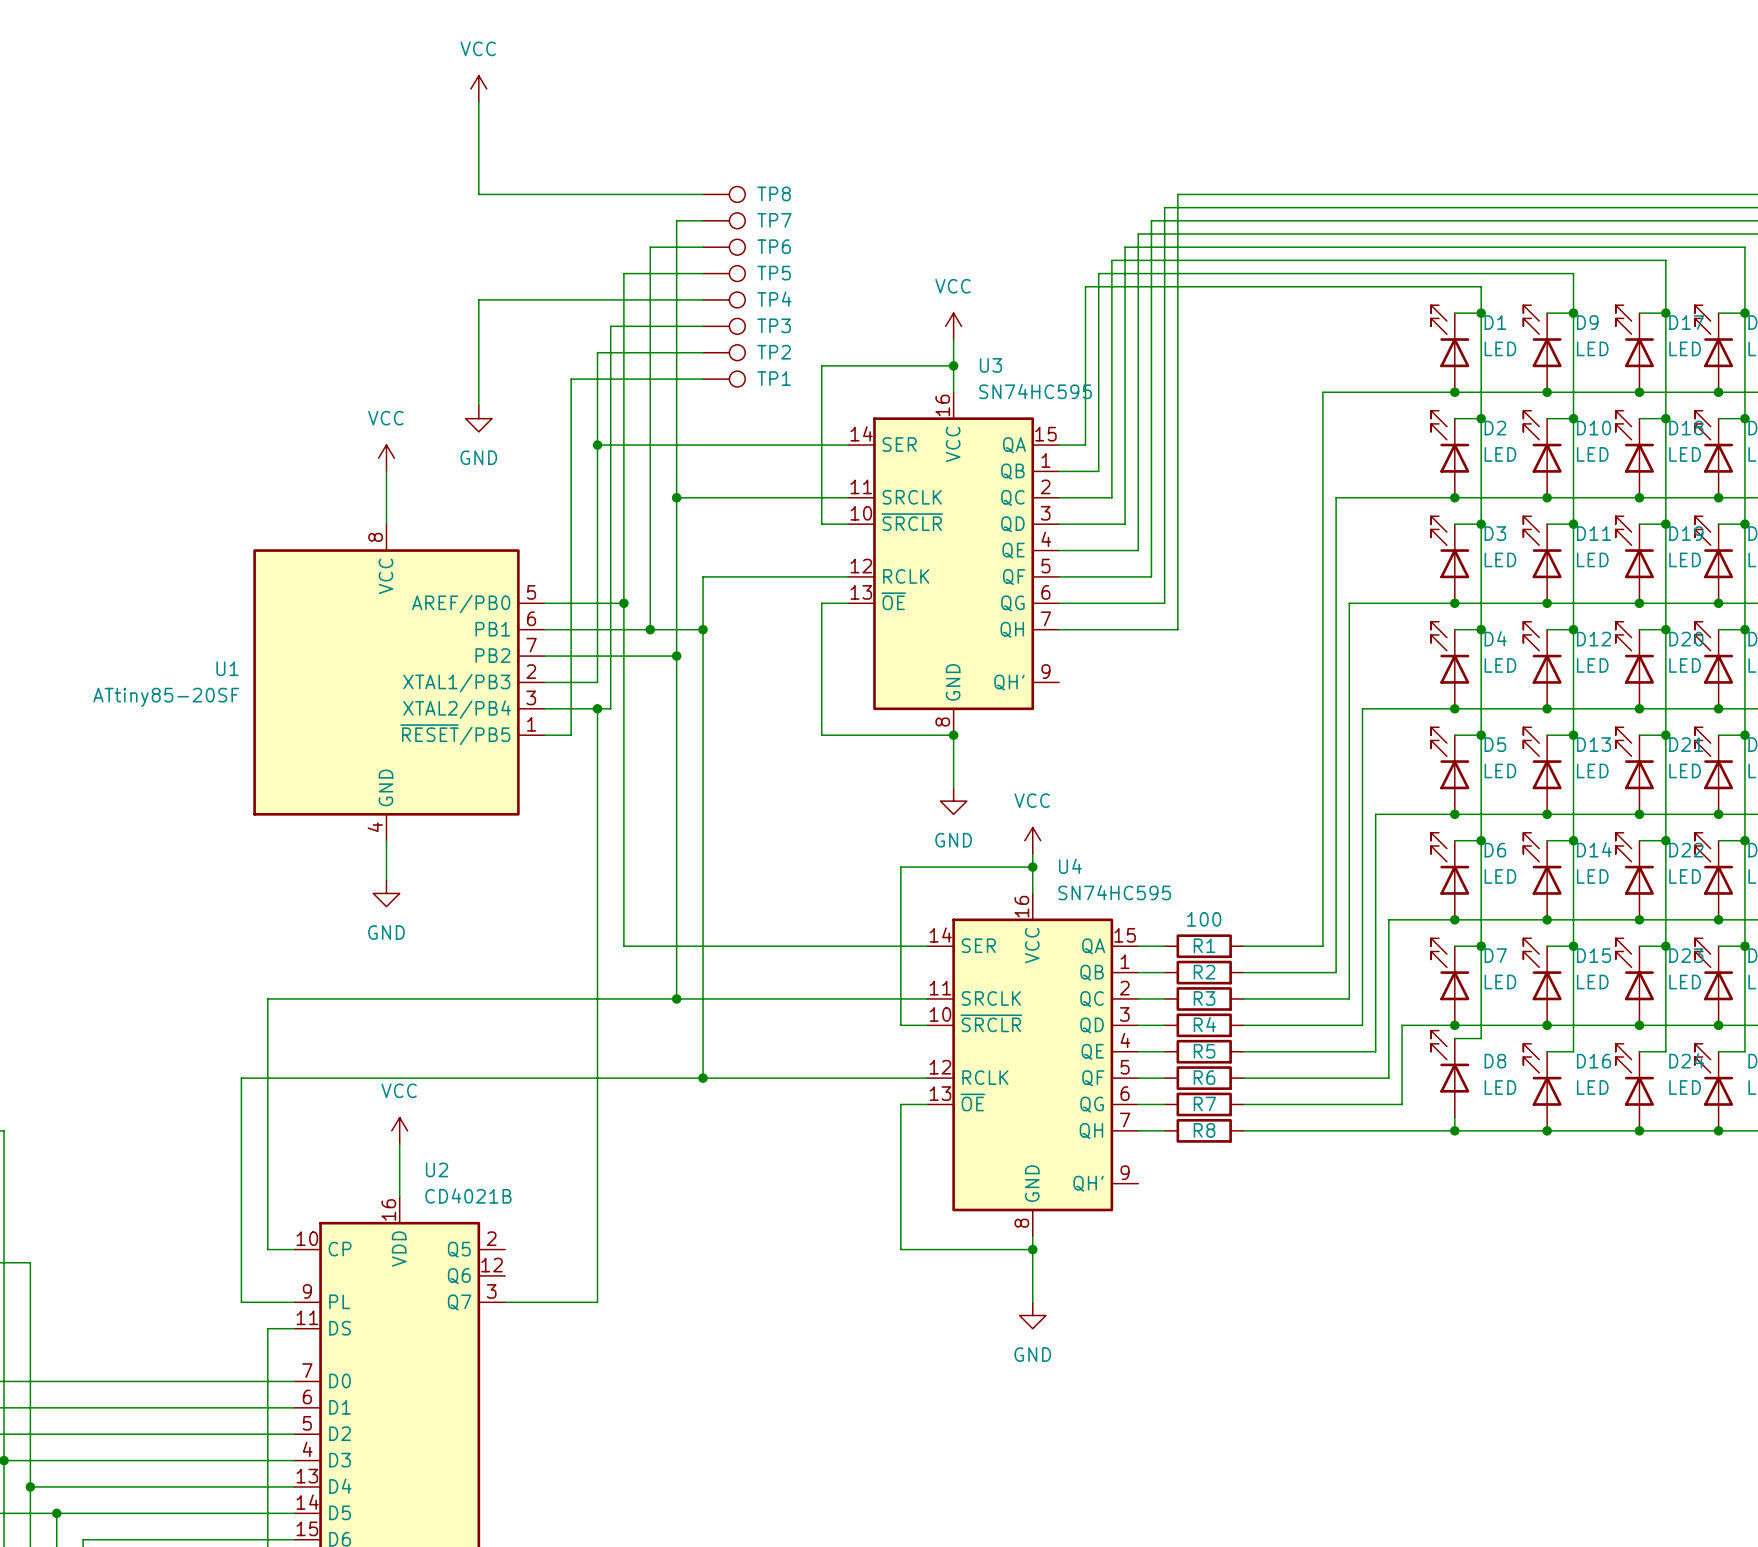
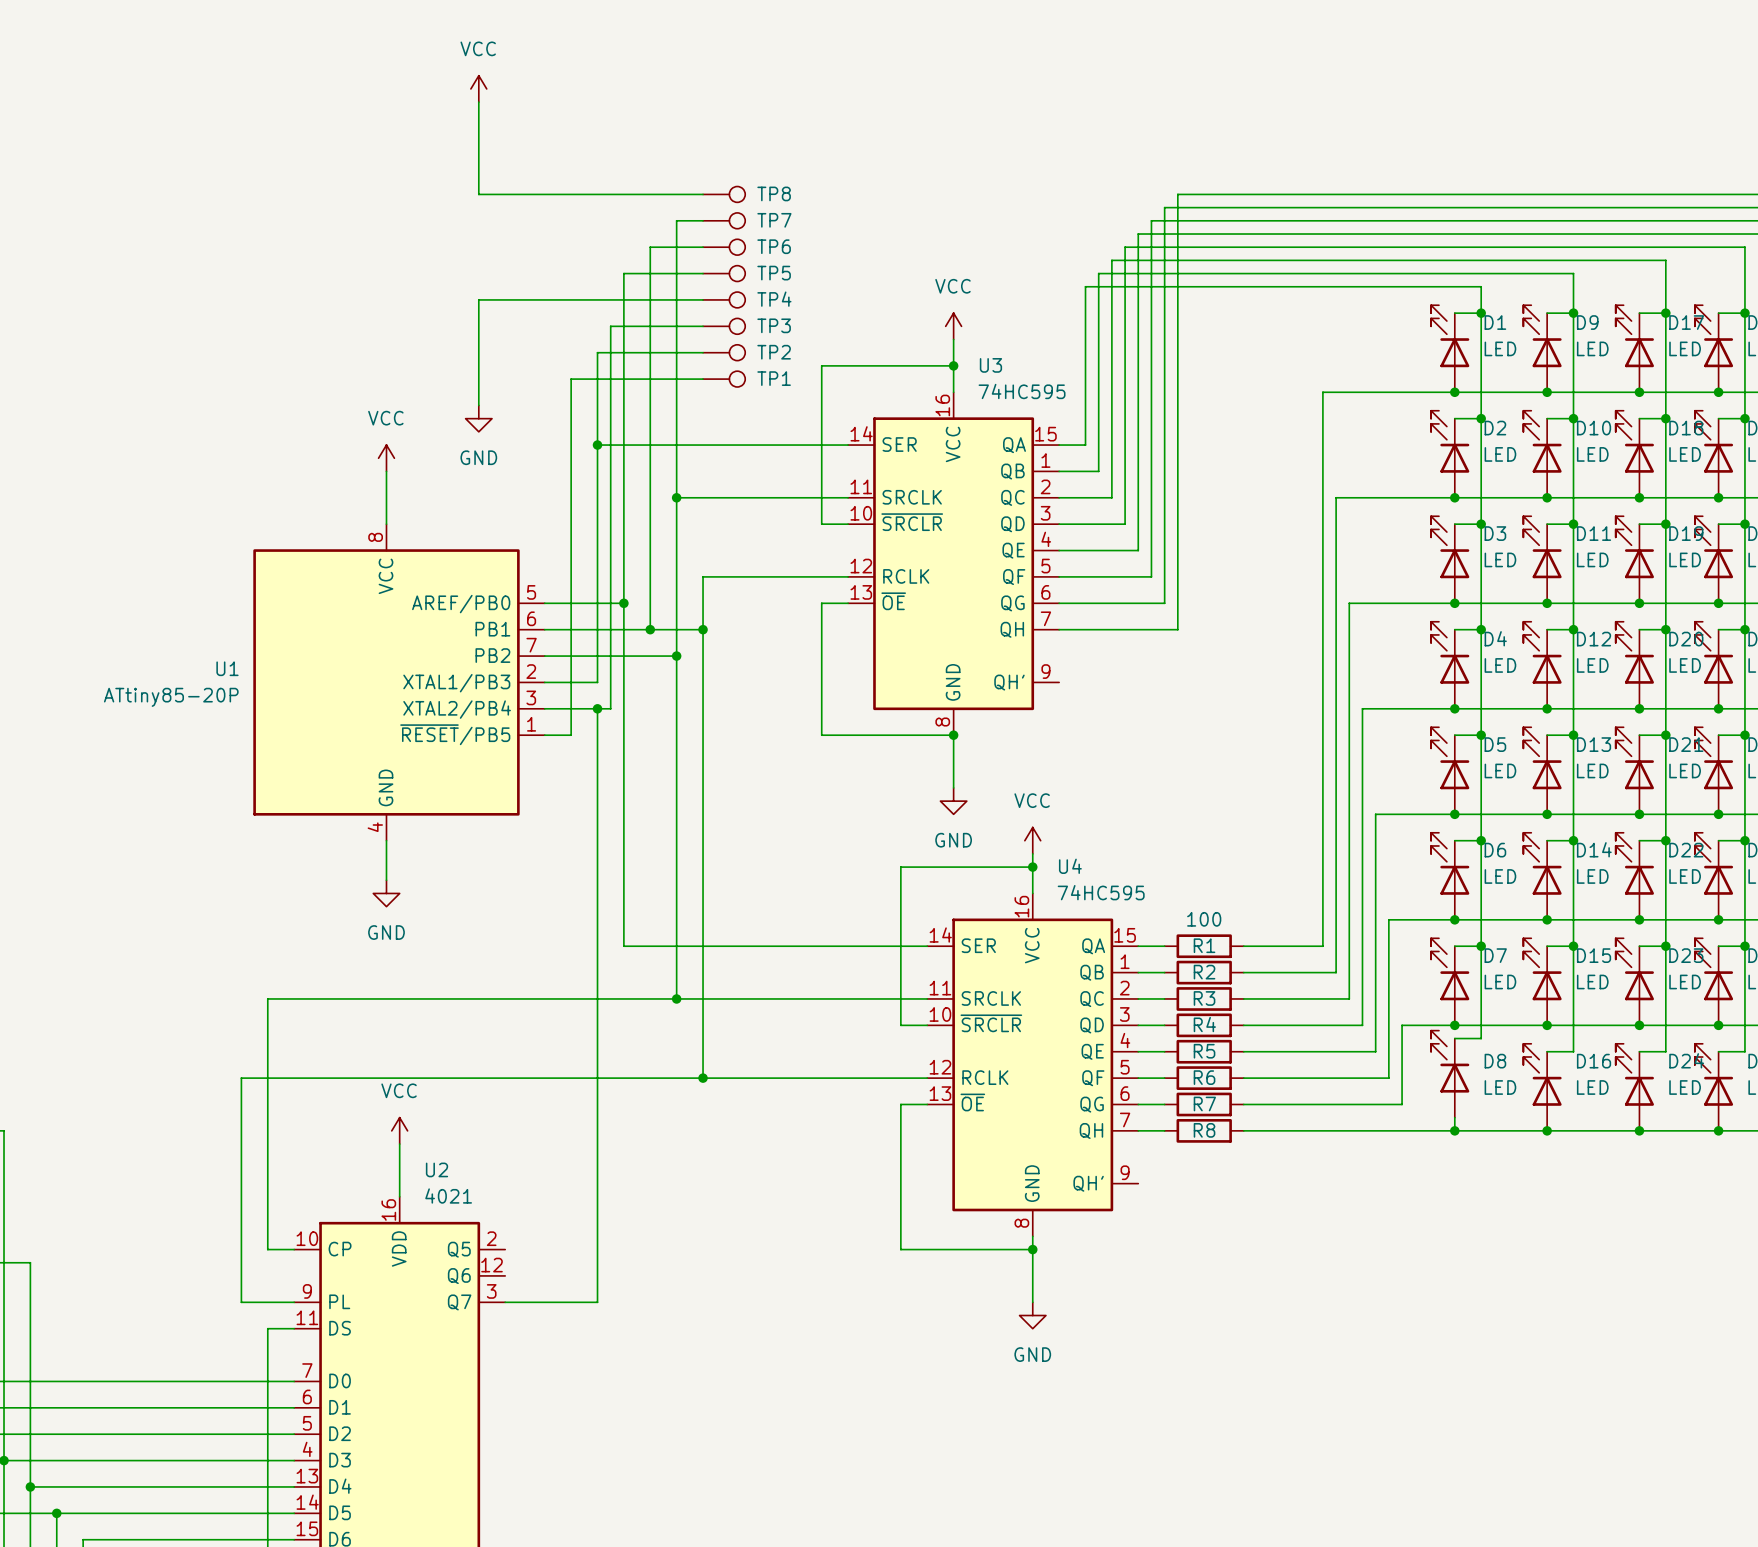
U3 value: SN74HC595 (1035, 391) -> 74HC595 (1022, 391)
U1 value: ATtiny85-20SF (166, 697) -> ATtiny85-20P (171, 697)
U4 value: SN74HC595 (1114, 892) -> 74HC595 (1101, 892)
U2 value: CD4021B (468, 1196) -> 4021 (448, 1196)

